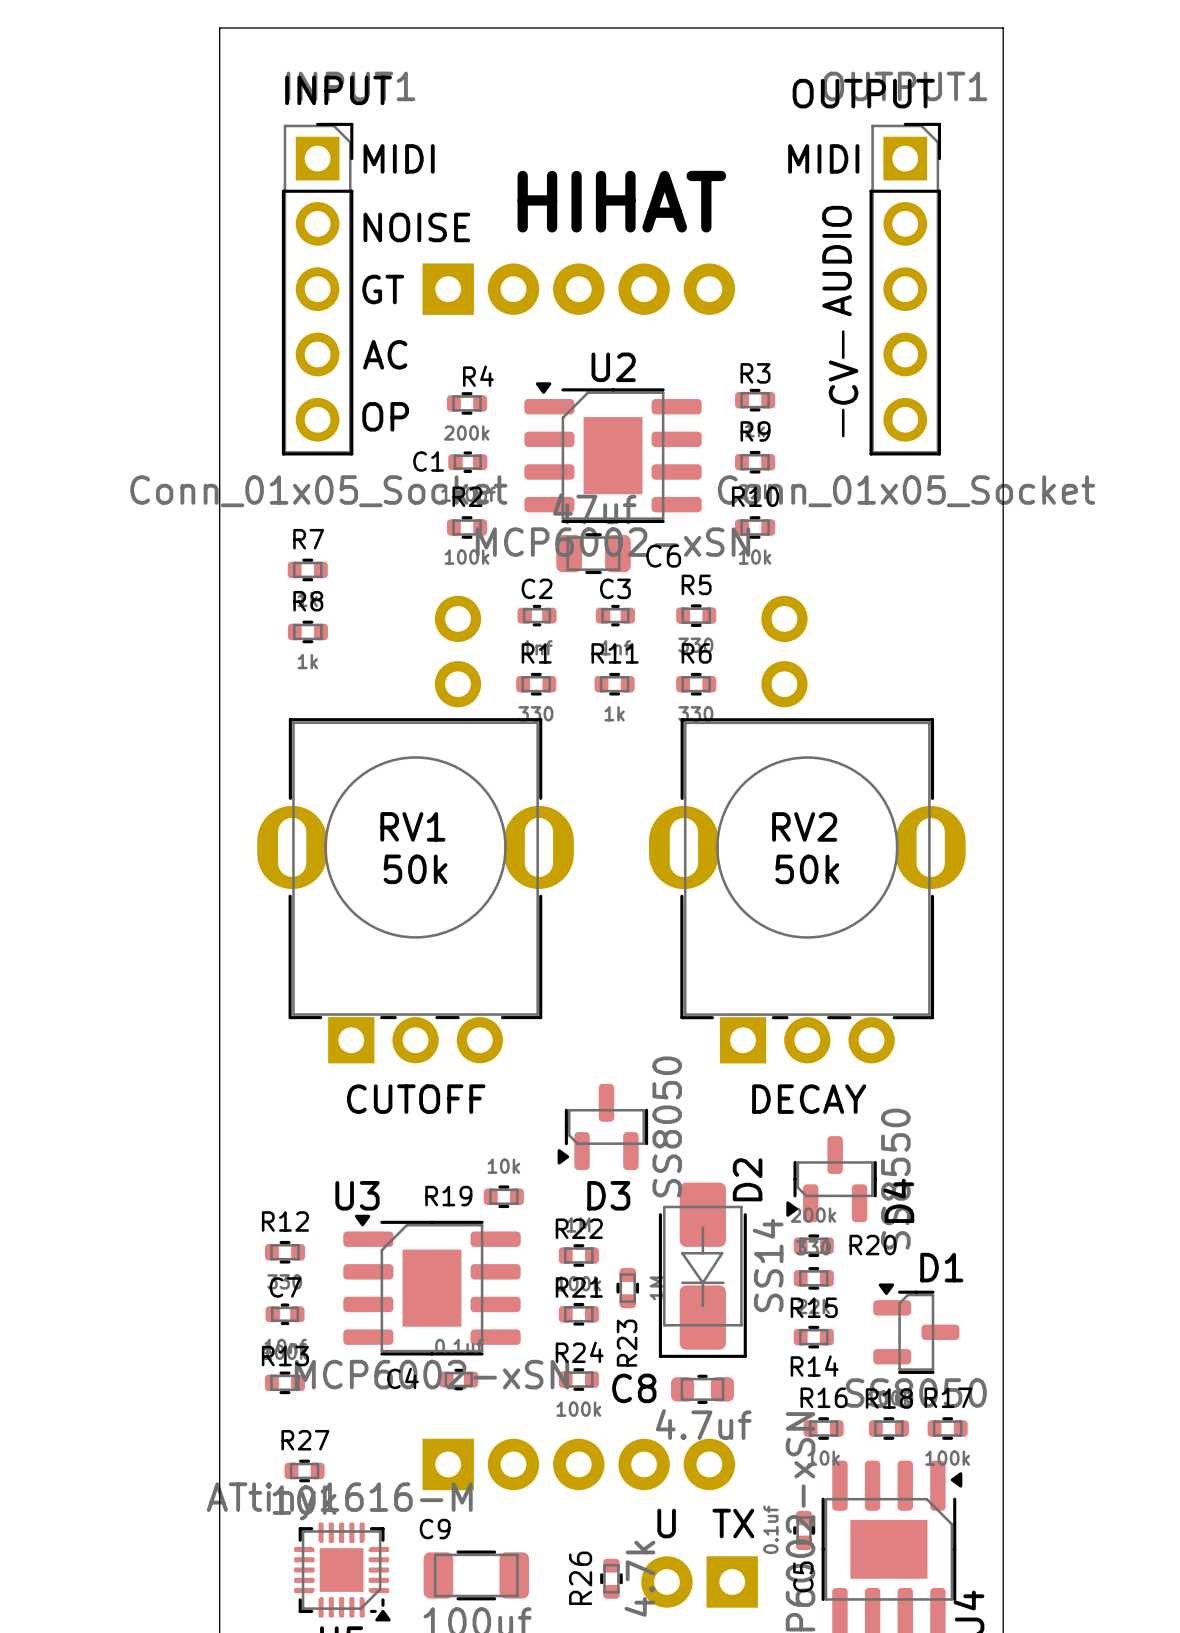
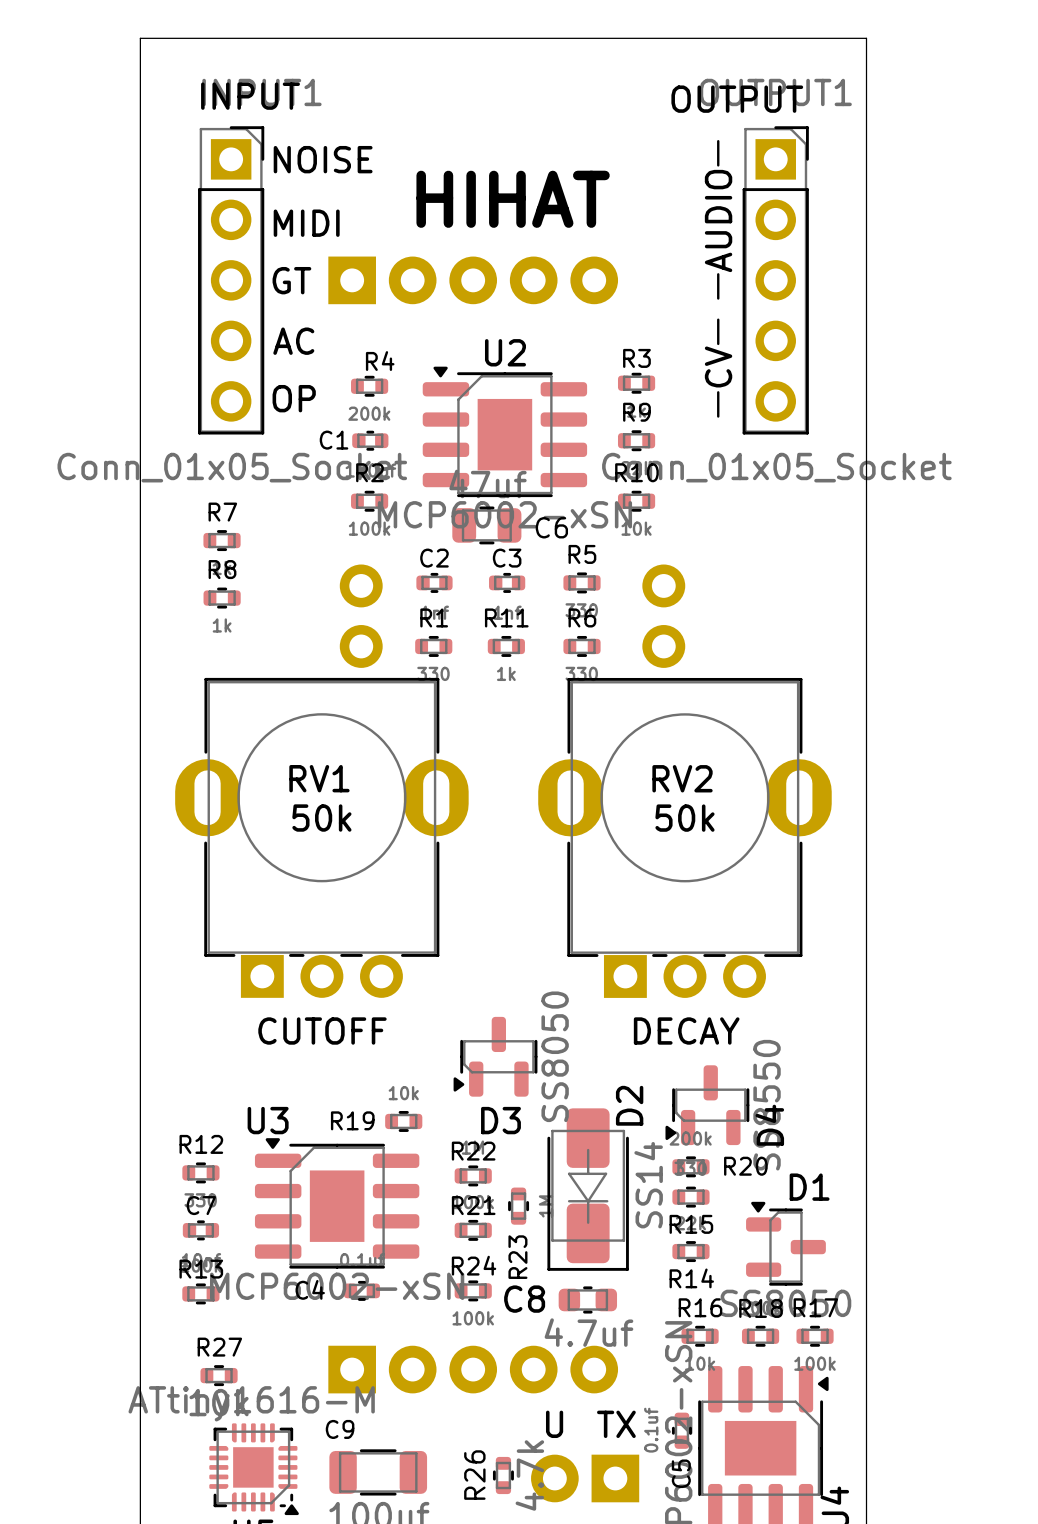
line: none -> (718, 141) (718, 165)
text: MIDI (399, 158) -> NOISE (323, 159)
text: MIDI (823, 158) -> none
text: NOISE (416, 227) -> MIDI (306, 223)
text position: AUDIO (837, 261) -> AUDIO (718, 221)
line: none -> (718, 274) (718, 298)

